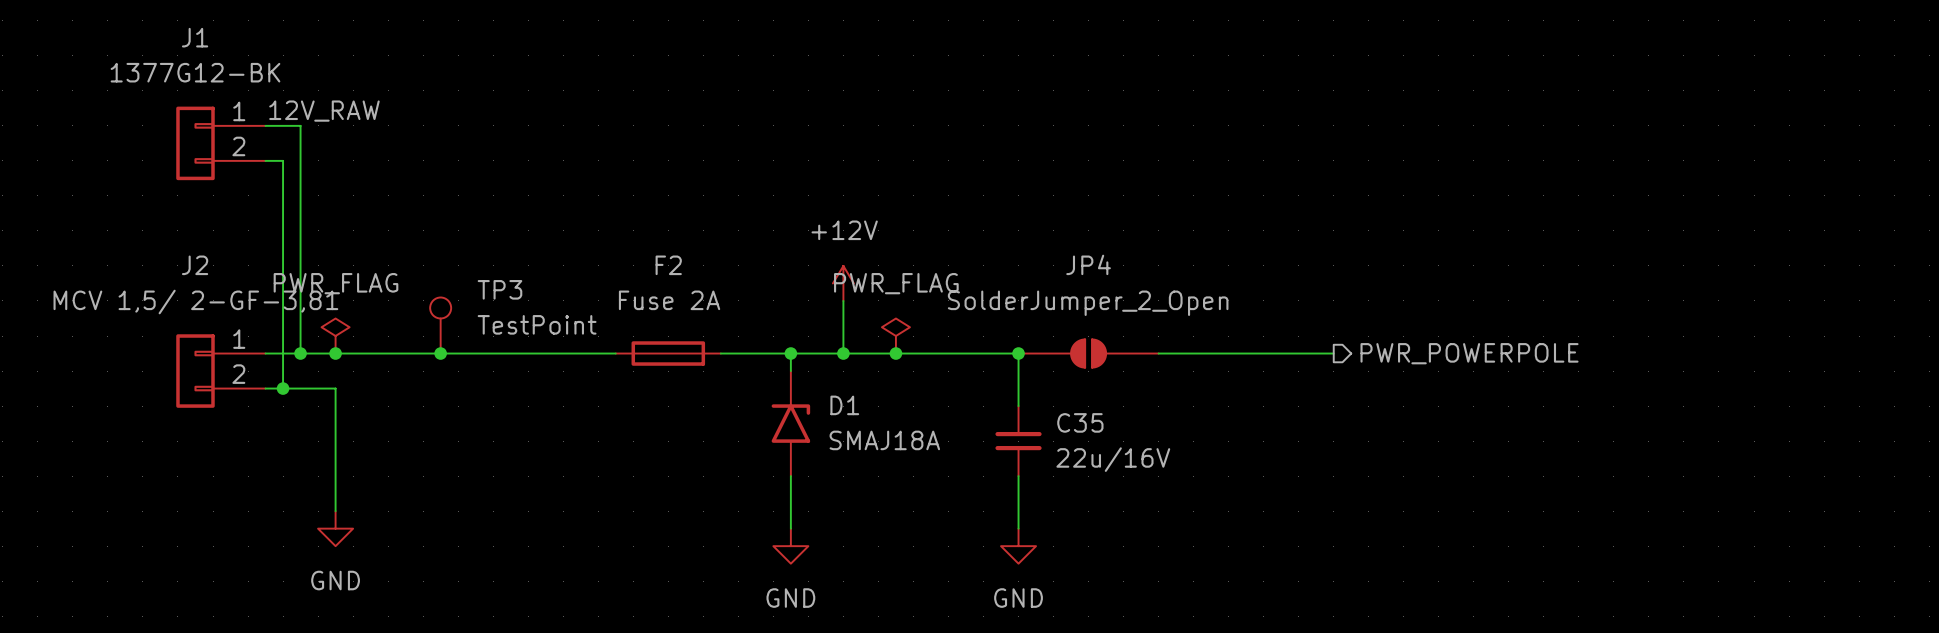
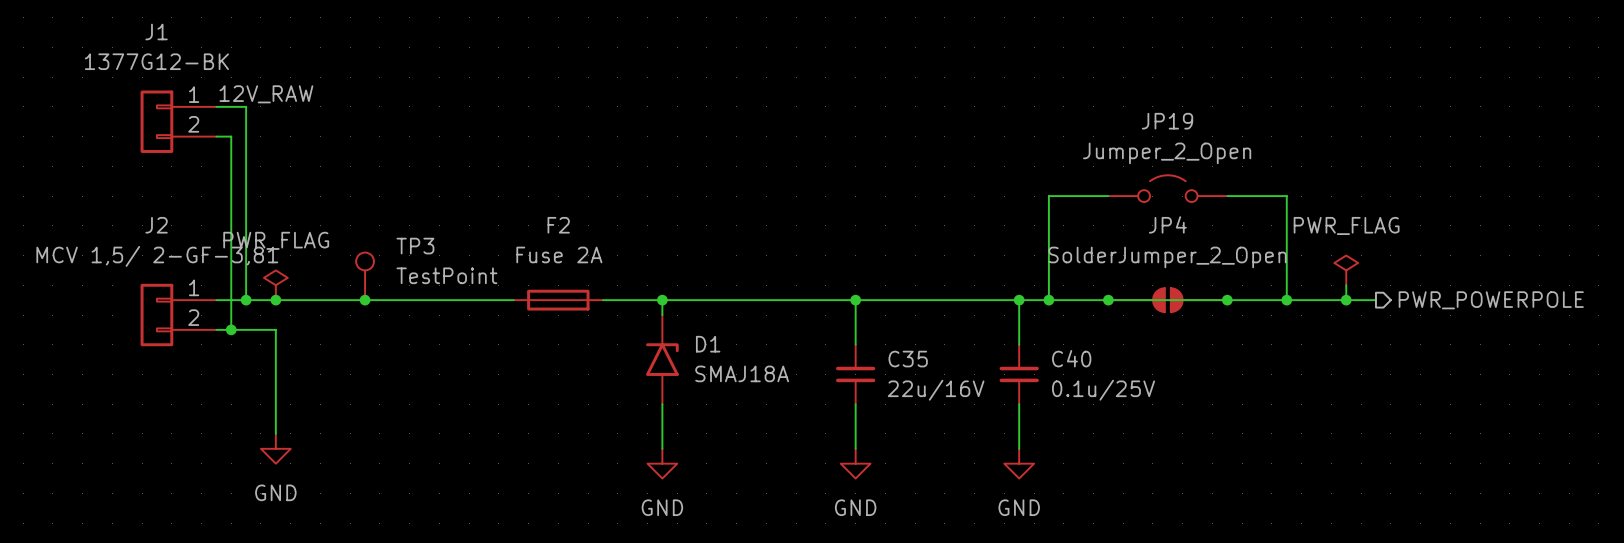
JP19: none -> Jumper_2_Open (1167, 188)
wire: none -> (1108, 196) (1048, 196) (1048, 300)
wire: none -> (1227, 196) (1286, 196) (1286, 300)
power symbol: +12V (843, 283) -> none
wire: (843, 300) (843, 353) -> none
power symbol: none -> PWR_FLAG (1346, 270)
power symbol: PWR_FLAG (895, 336) -> none
wire: none -> (1346, 285) (1346, 300)
junction: (843, 353) -> none
junction: (895, 353) -> none
JP4 position: (1088, 353) -> (1167, 300)
wire: none -> (1019, 300) (1019, 344)
junction: none -> (1019, 300)
junction: none -> (1048, 300)
junction: none -> (1108, 300)
wire: none -> (1123, 300) (1375, 300)
junction: none -> (1227, 300)
hierarchical label position: PWR_POWERPOLE (1469, 353) -> PWR_POWERPOLE (1491, 300)
junction: none -> (1286, 300)
junction: none -> (1346, 300)
C40: none -> 0.1u/25V (1019, 374)
wire: none -> (1019, 404) (1019, 448)
power symbol: none -> GND (1019, 463)

